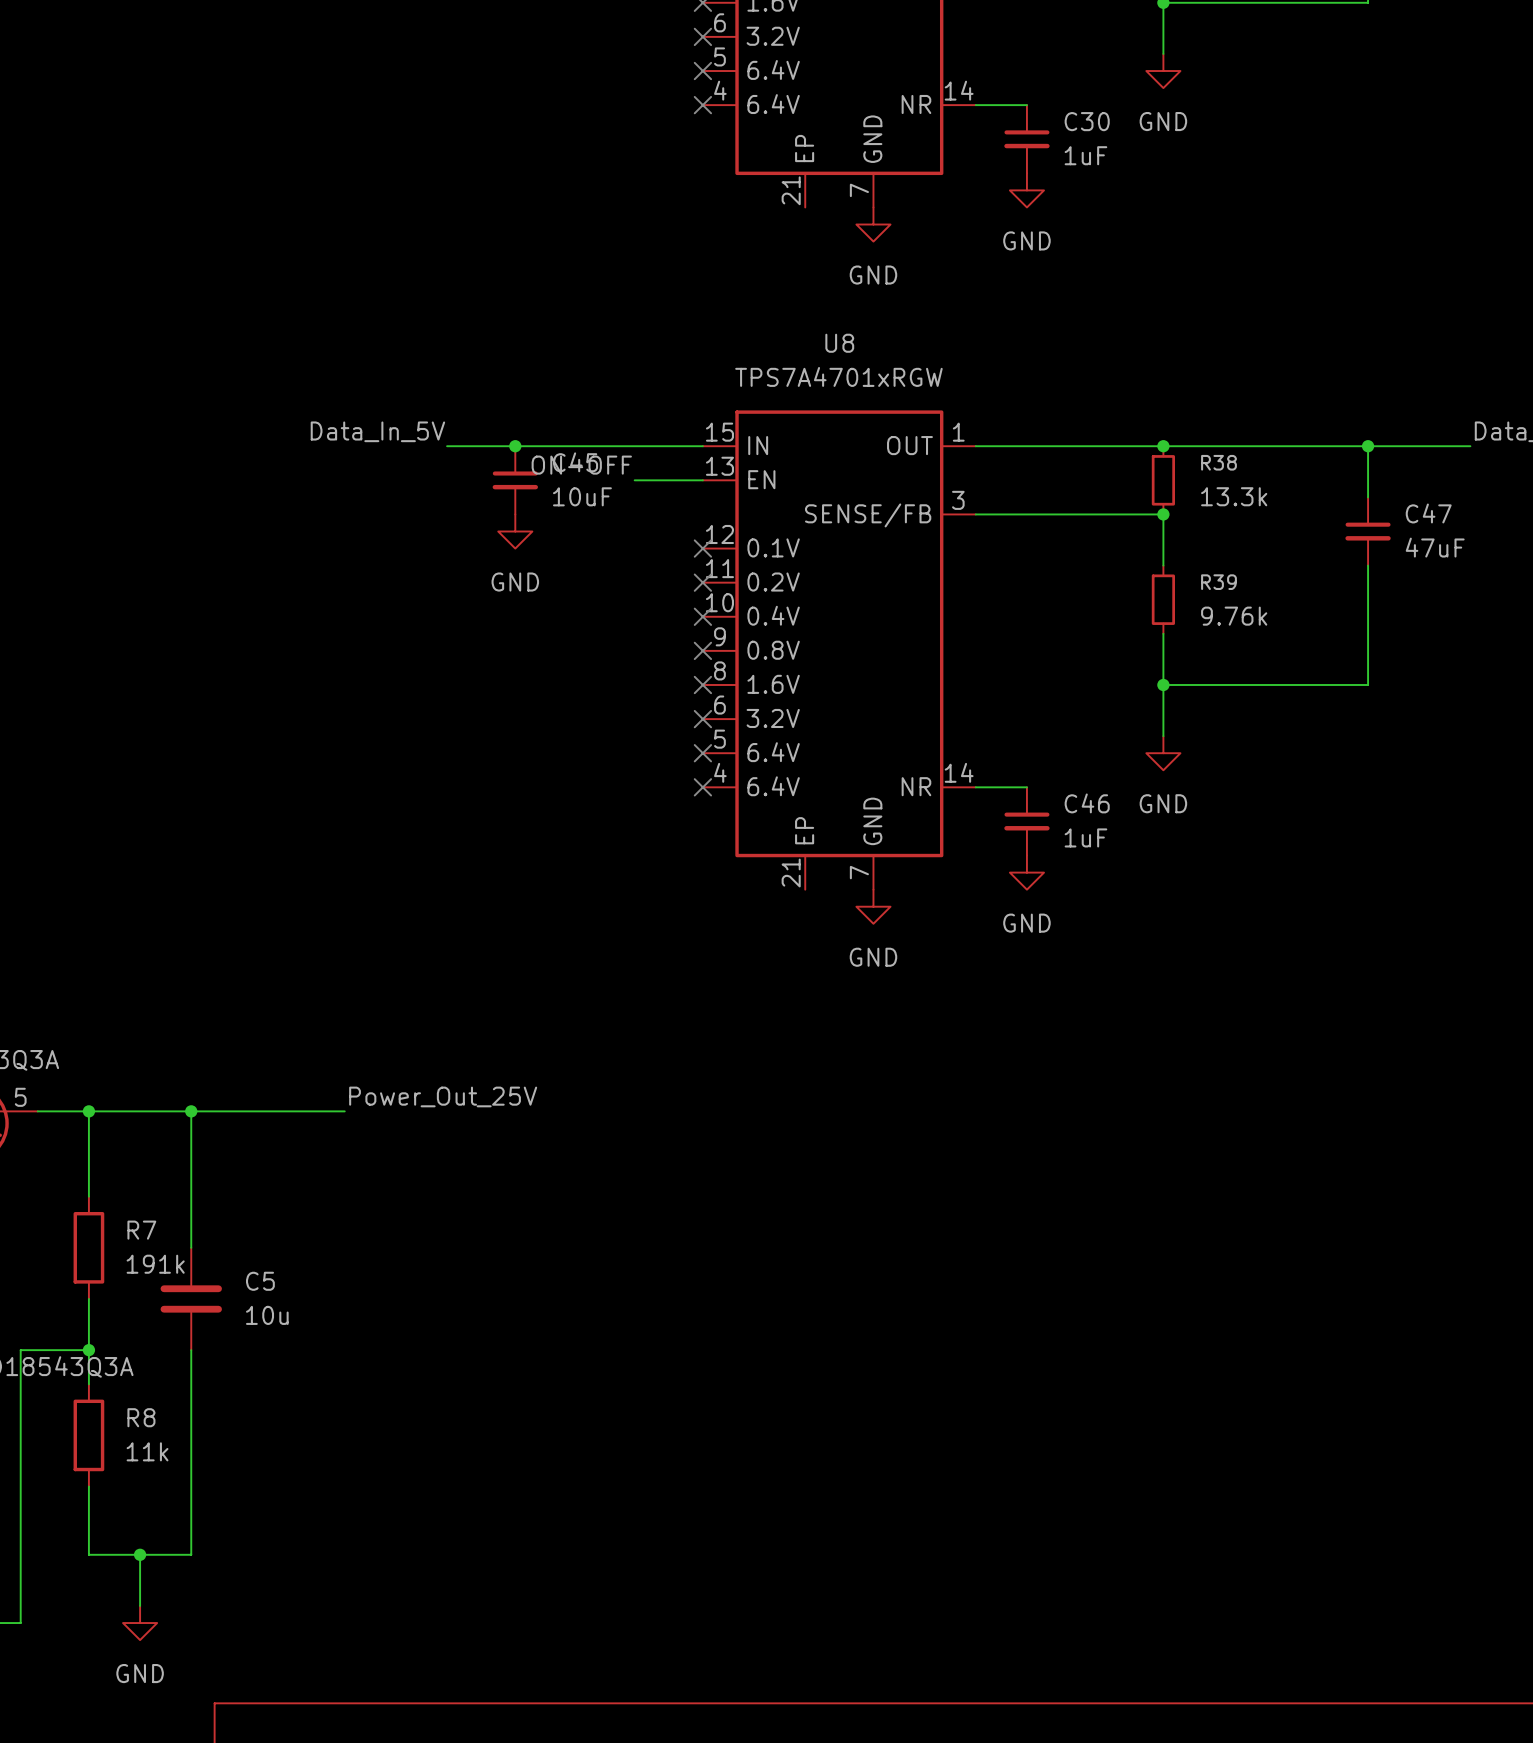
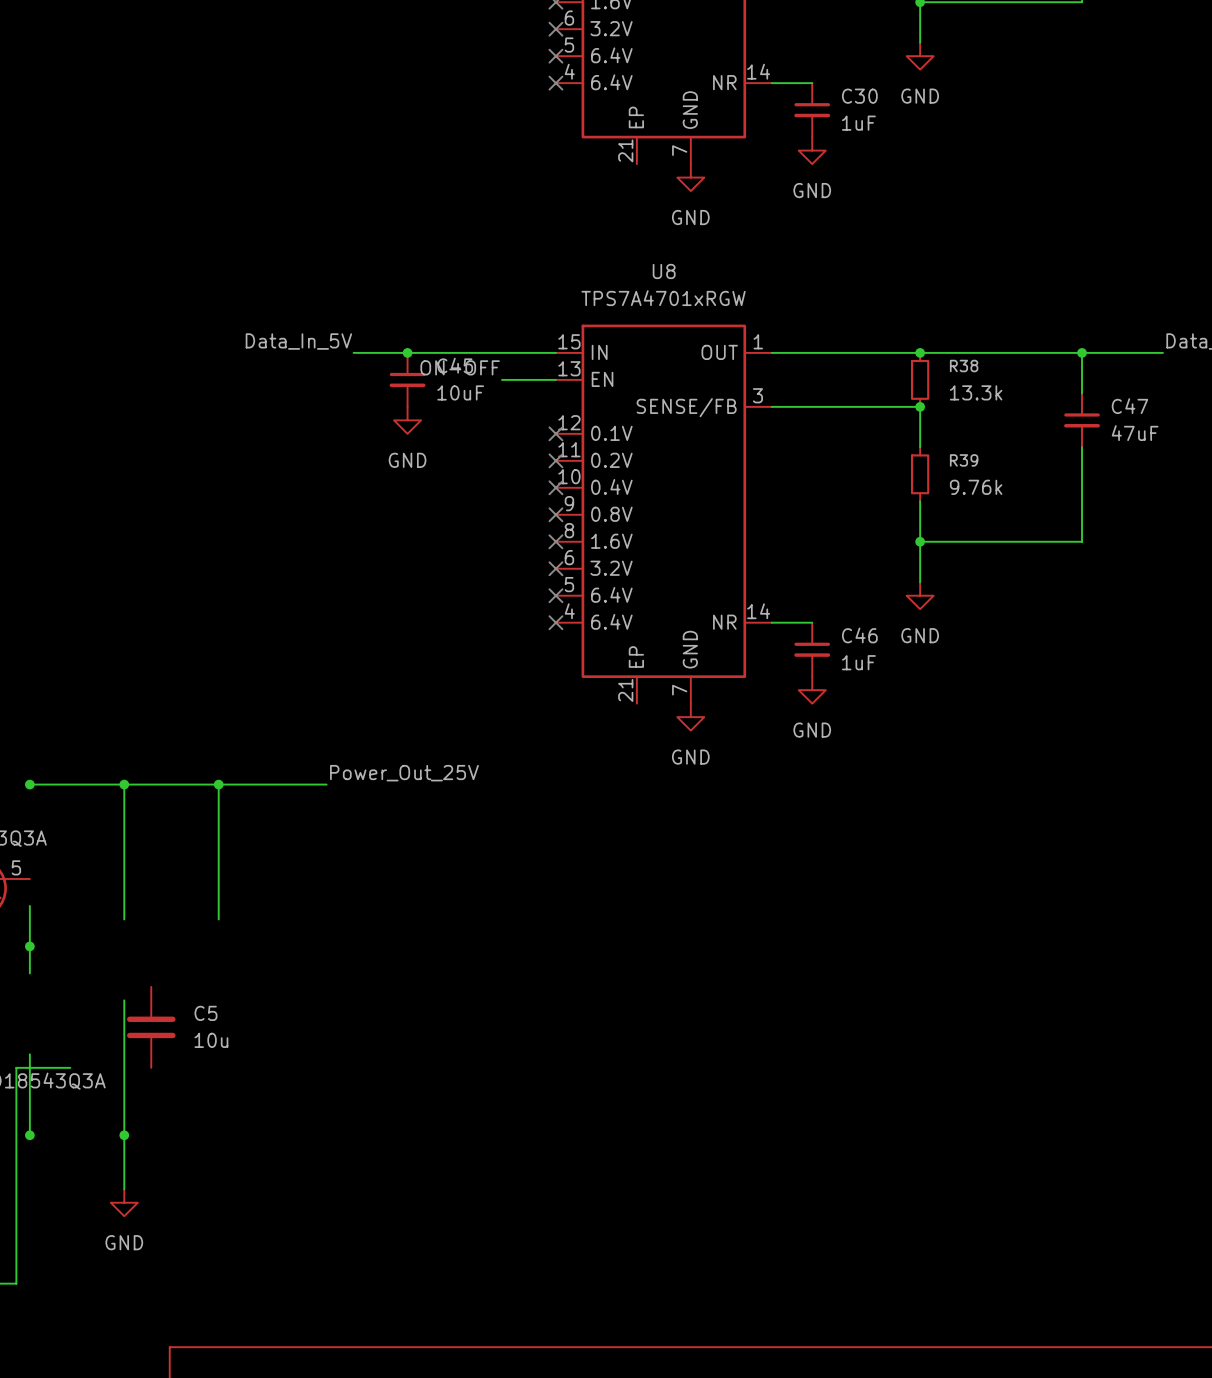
wire: none -> (29, 784) (326, 784)
junction: none -> (29, 784)
wire: none -> (124, 784) (124, 919)
junction: none -> (124, 784)
wire: none -> (218, 784) (218, 919)
junction: none -> (218, 784)
label position: Power_Out_25V (443, 1096) -> Power_Out_25V (404, 773)
wire: (37, 1111) (344, 1111) -> none
wire: (88, 1111) (88, 1196) -> (29, 905) (29, 973)
junction: (88, 1111) -> none
wire: (191, 1111) (191, 1247) -> none
junction: (191, 1111) -> none
junction: none -> (29, 946)
R7: 191k (88, 1247) -> none
wire: none -> (124, 1000) (124, 1189)
wire: (88, 1298) (88, 1384) -> none
wire: none -> (29, 1054) (29, 1135)
junction: (88, 1350) -> none
wire: (191, 1350) (191, 1554) (88, 1554) (88, 1486) -> none
junction: none -> (29, 1135)
R8: 11k (88, 1435) -> none
junction: none -> (124, 1135)
wire: (140, 1554) (140, 1605) -> none
junction: (140, 1554) -> none
power symbol position: GND (140, 1623) -> GND (124, 1202)

